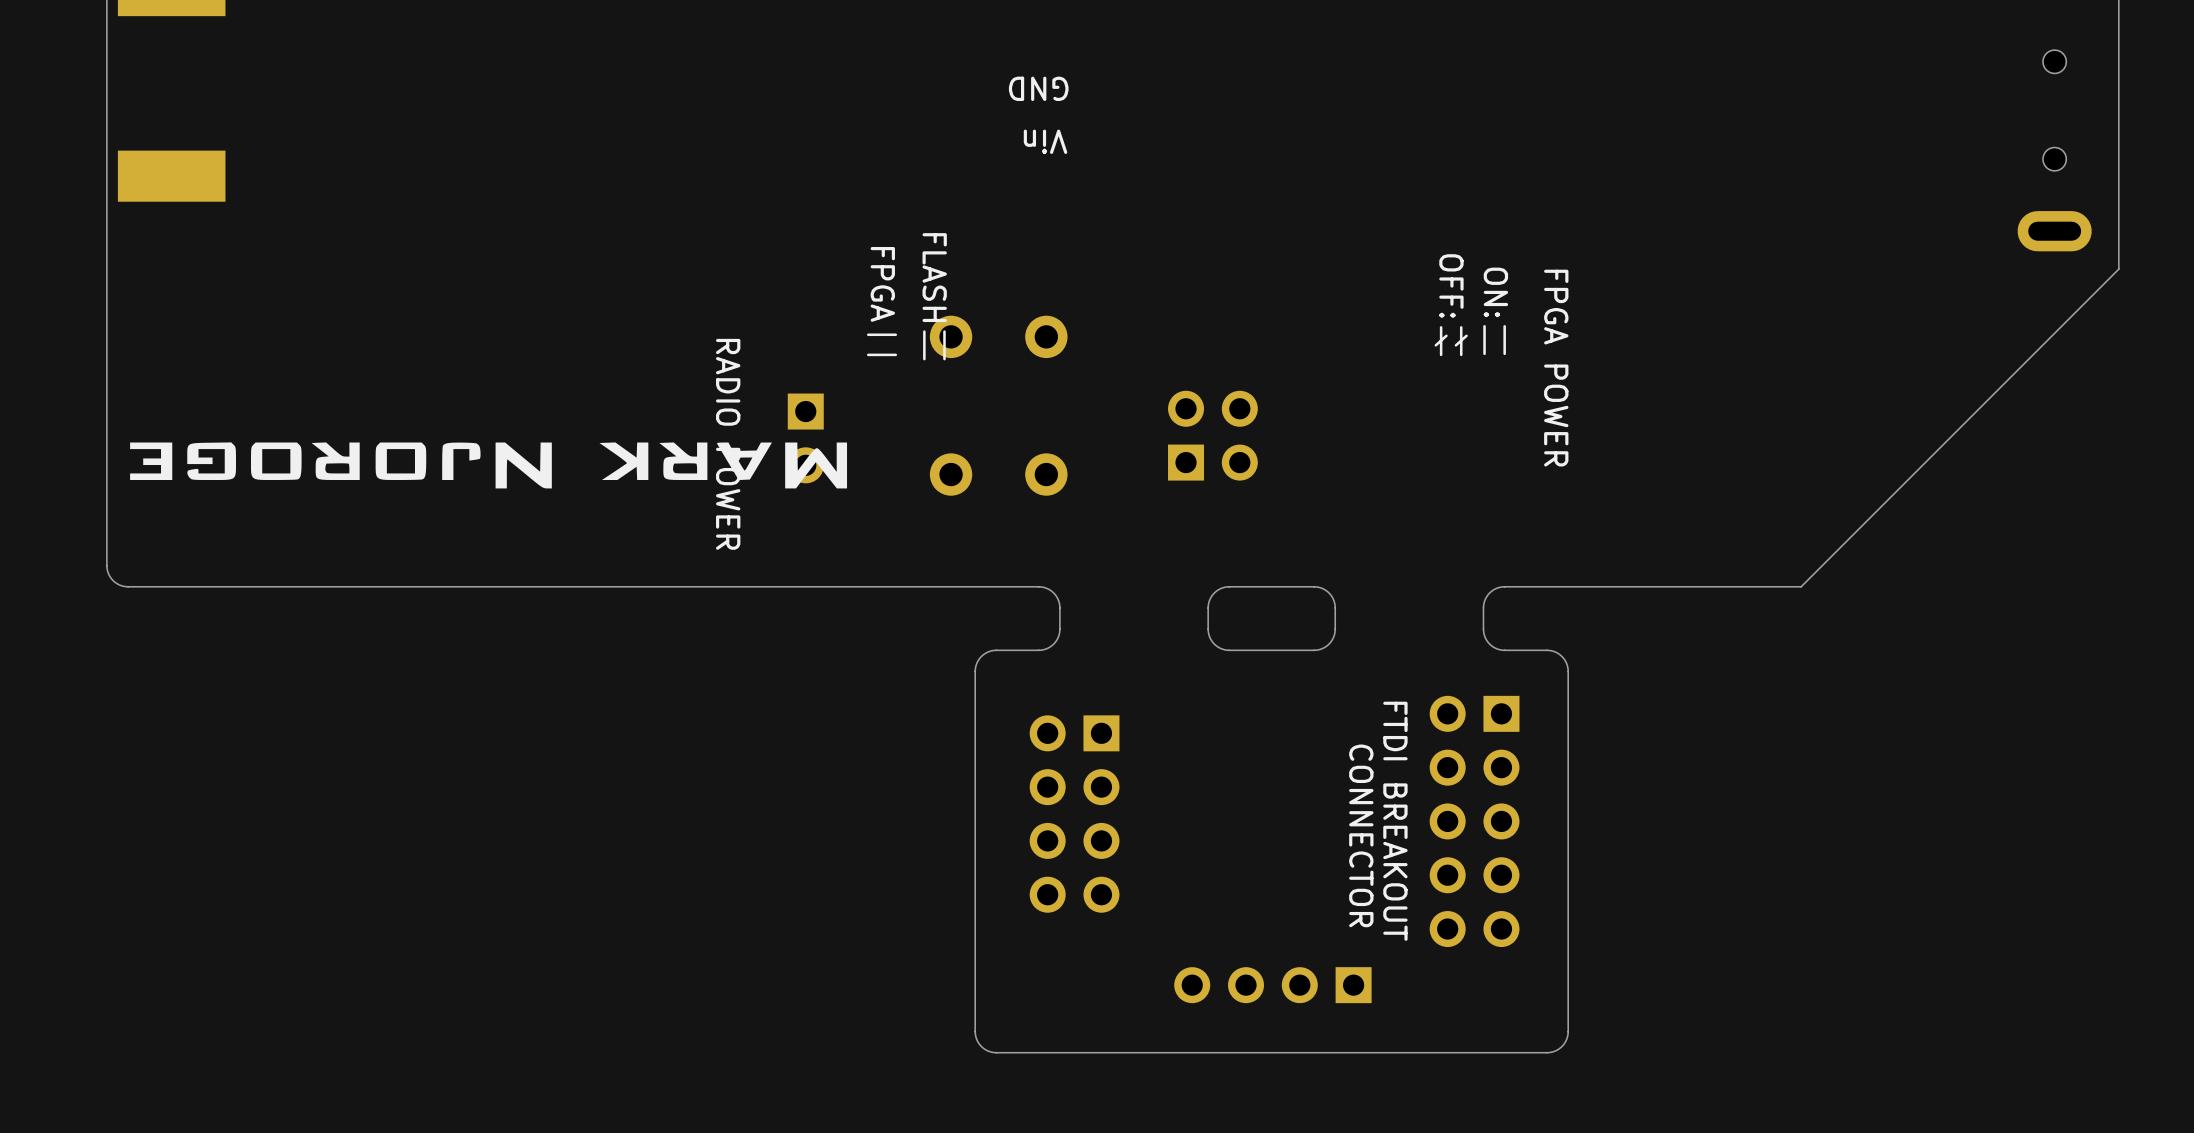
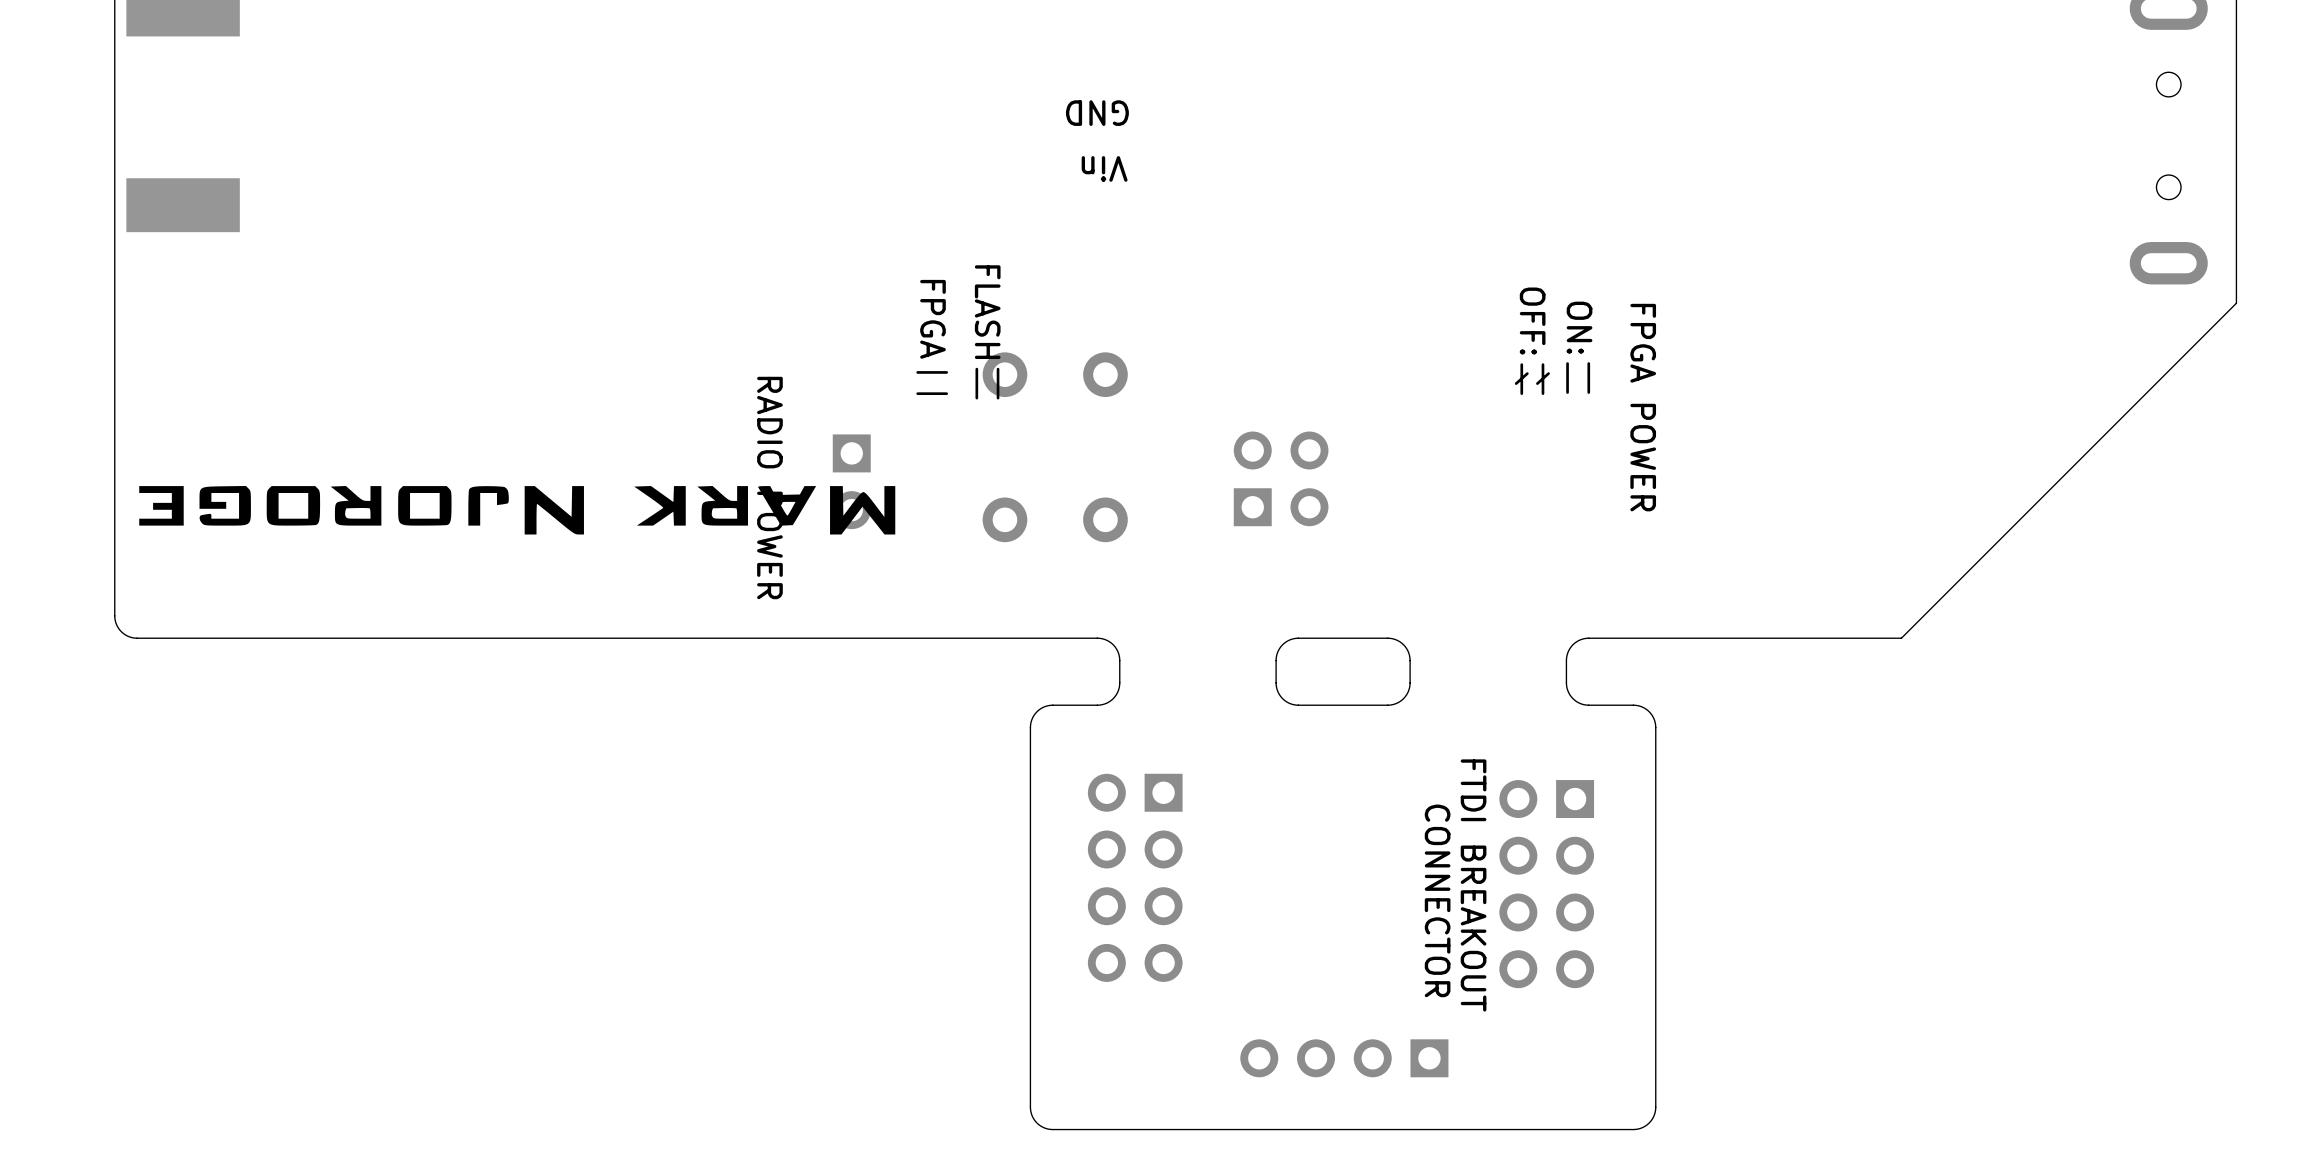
part footprint: [1429, 695, 1520, 948] -> [1499, 780, 1595, 989]

